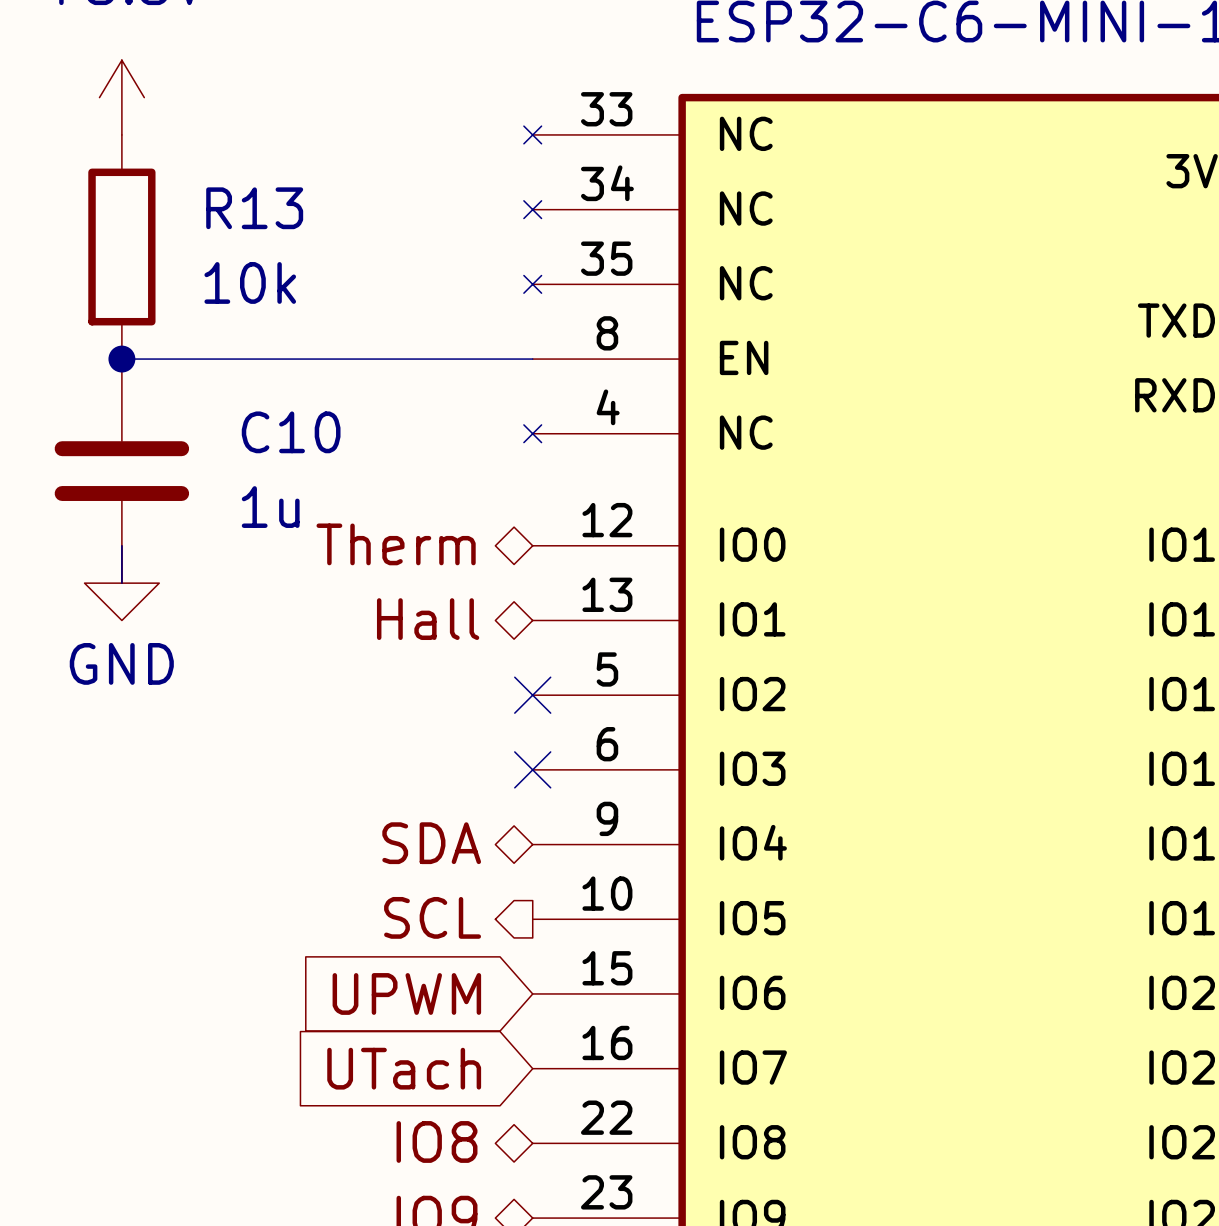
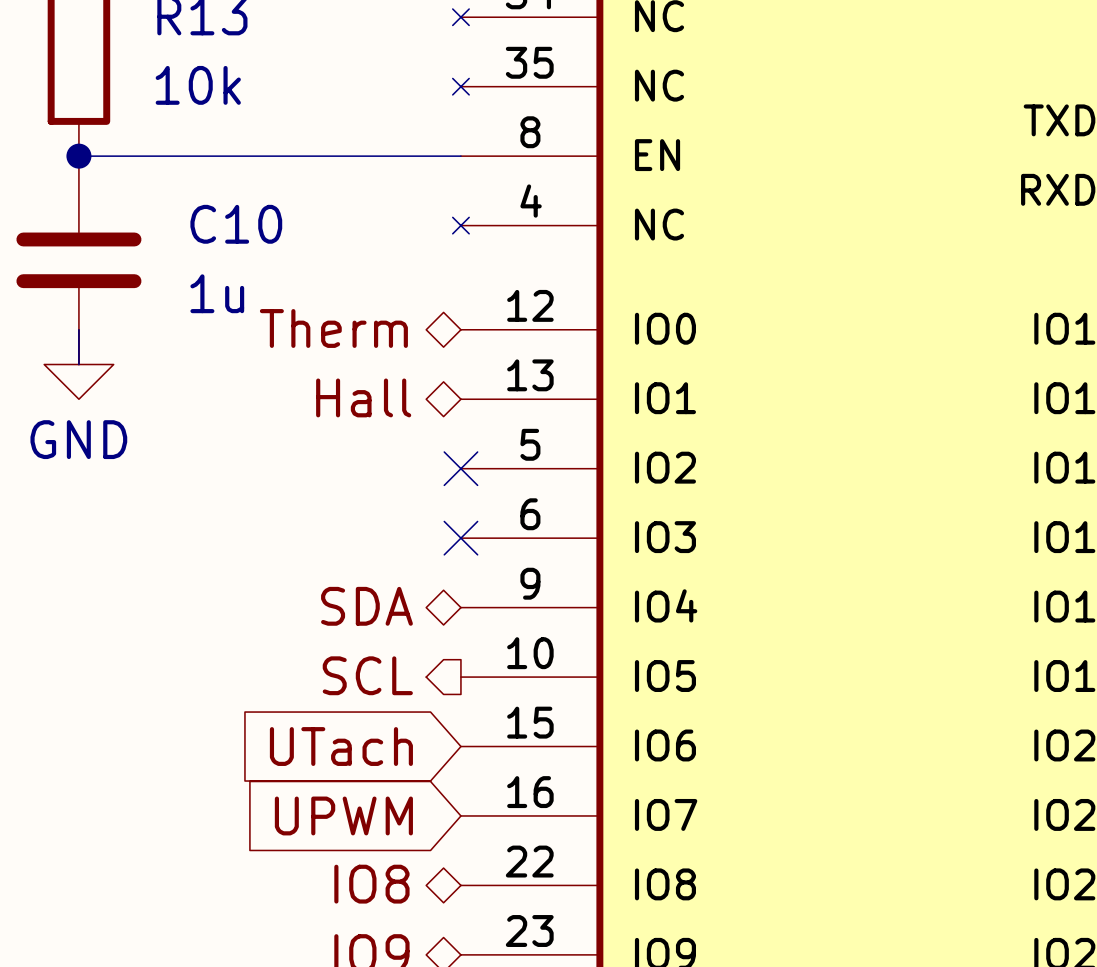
global label: UPWM (406, 993) -> UTach (341, 746)
global label: UTach (404, 1068) -> UPWM (343, 815)

